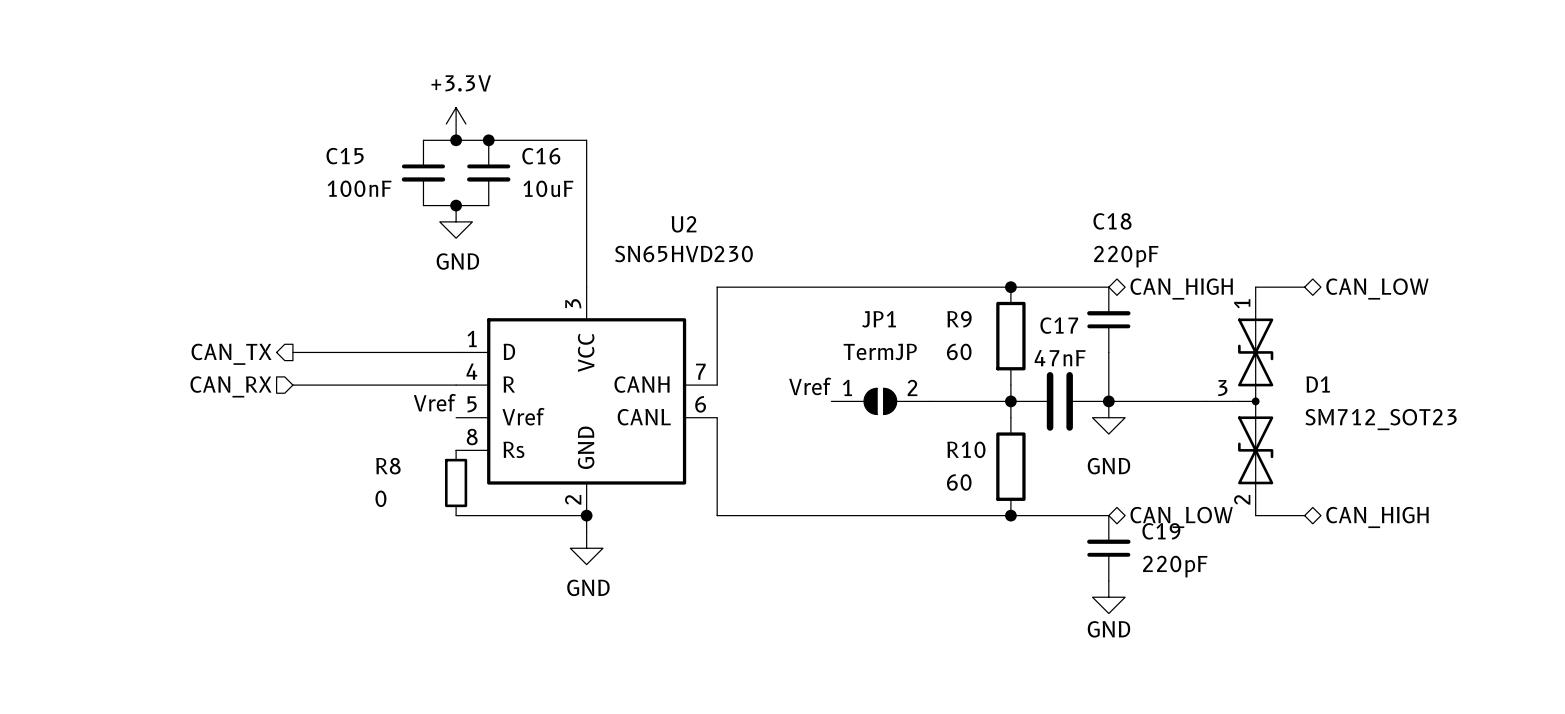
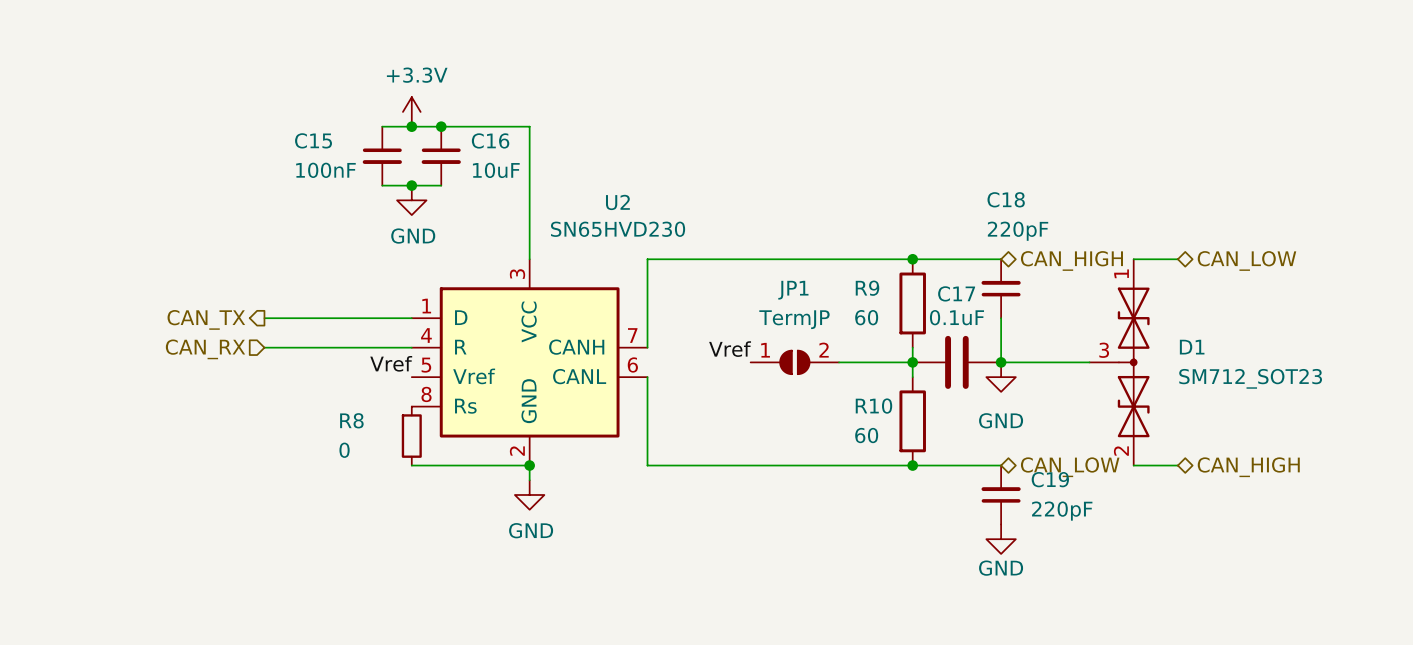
C17 value: 47nF (1060, 358) -> 0.1uF (956, 317)

